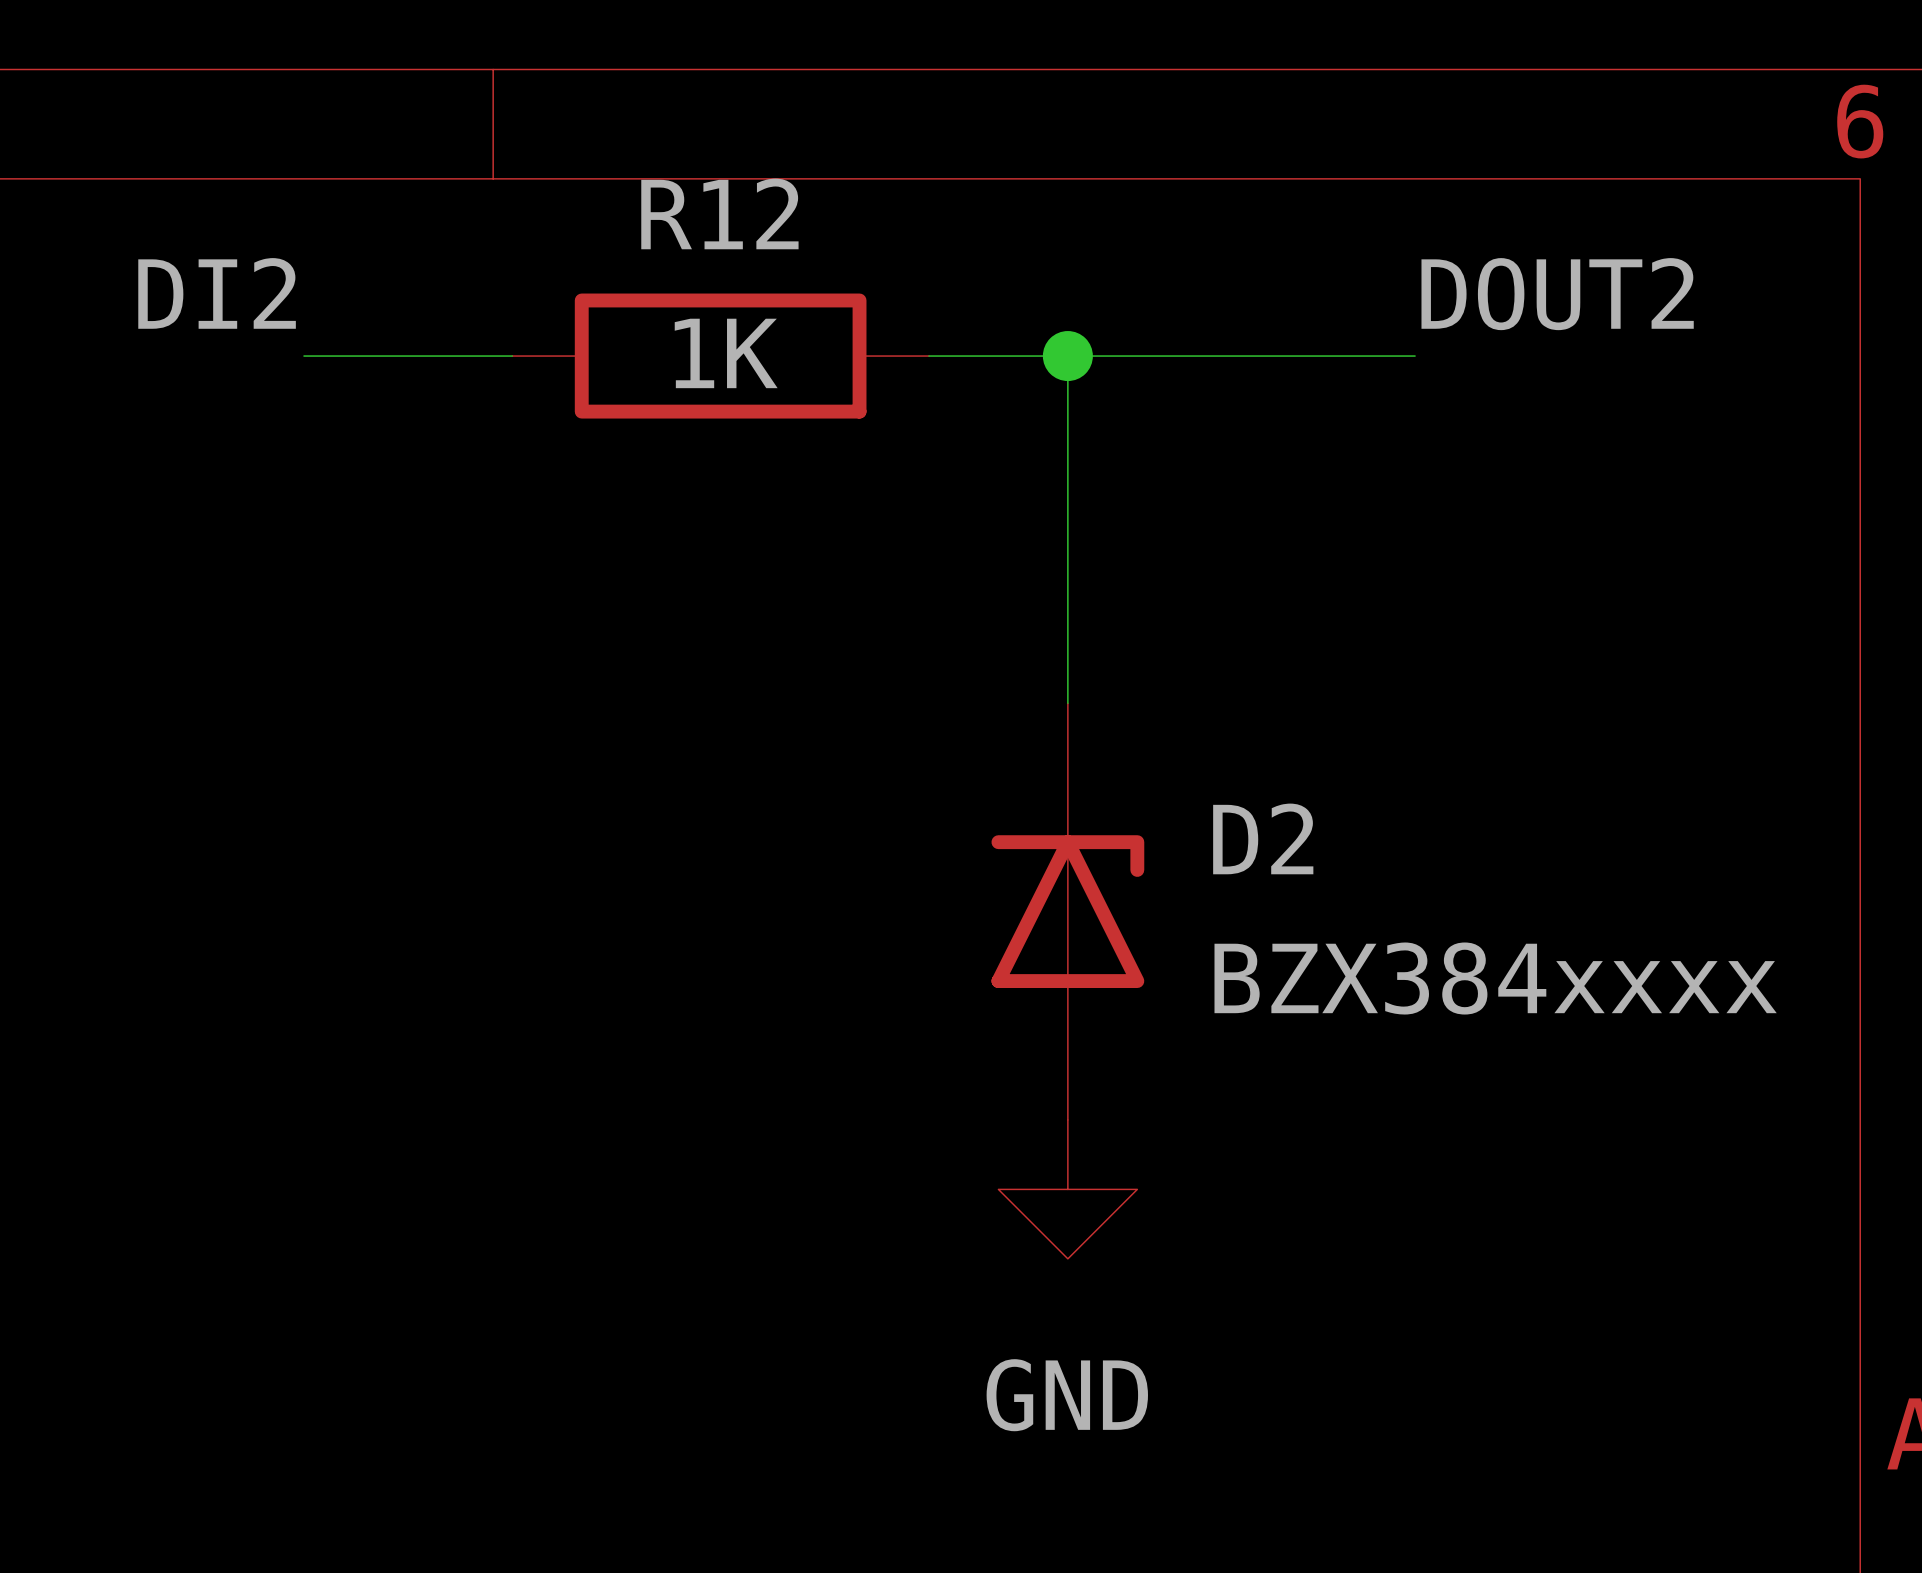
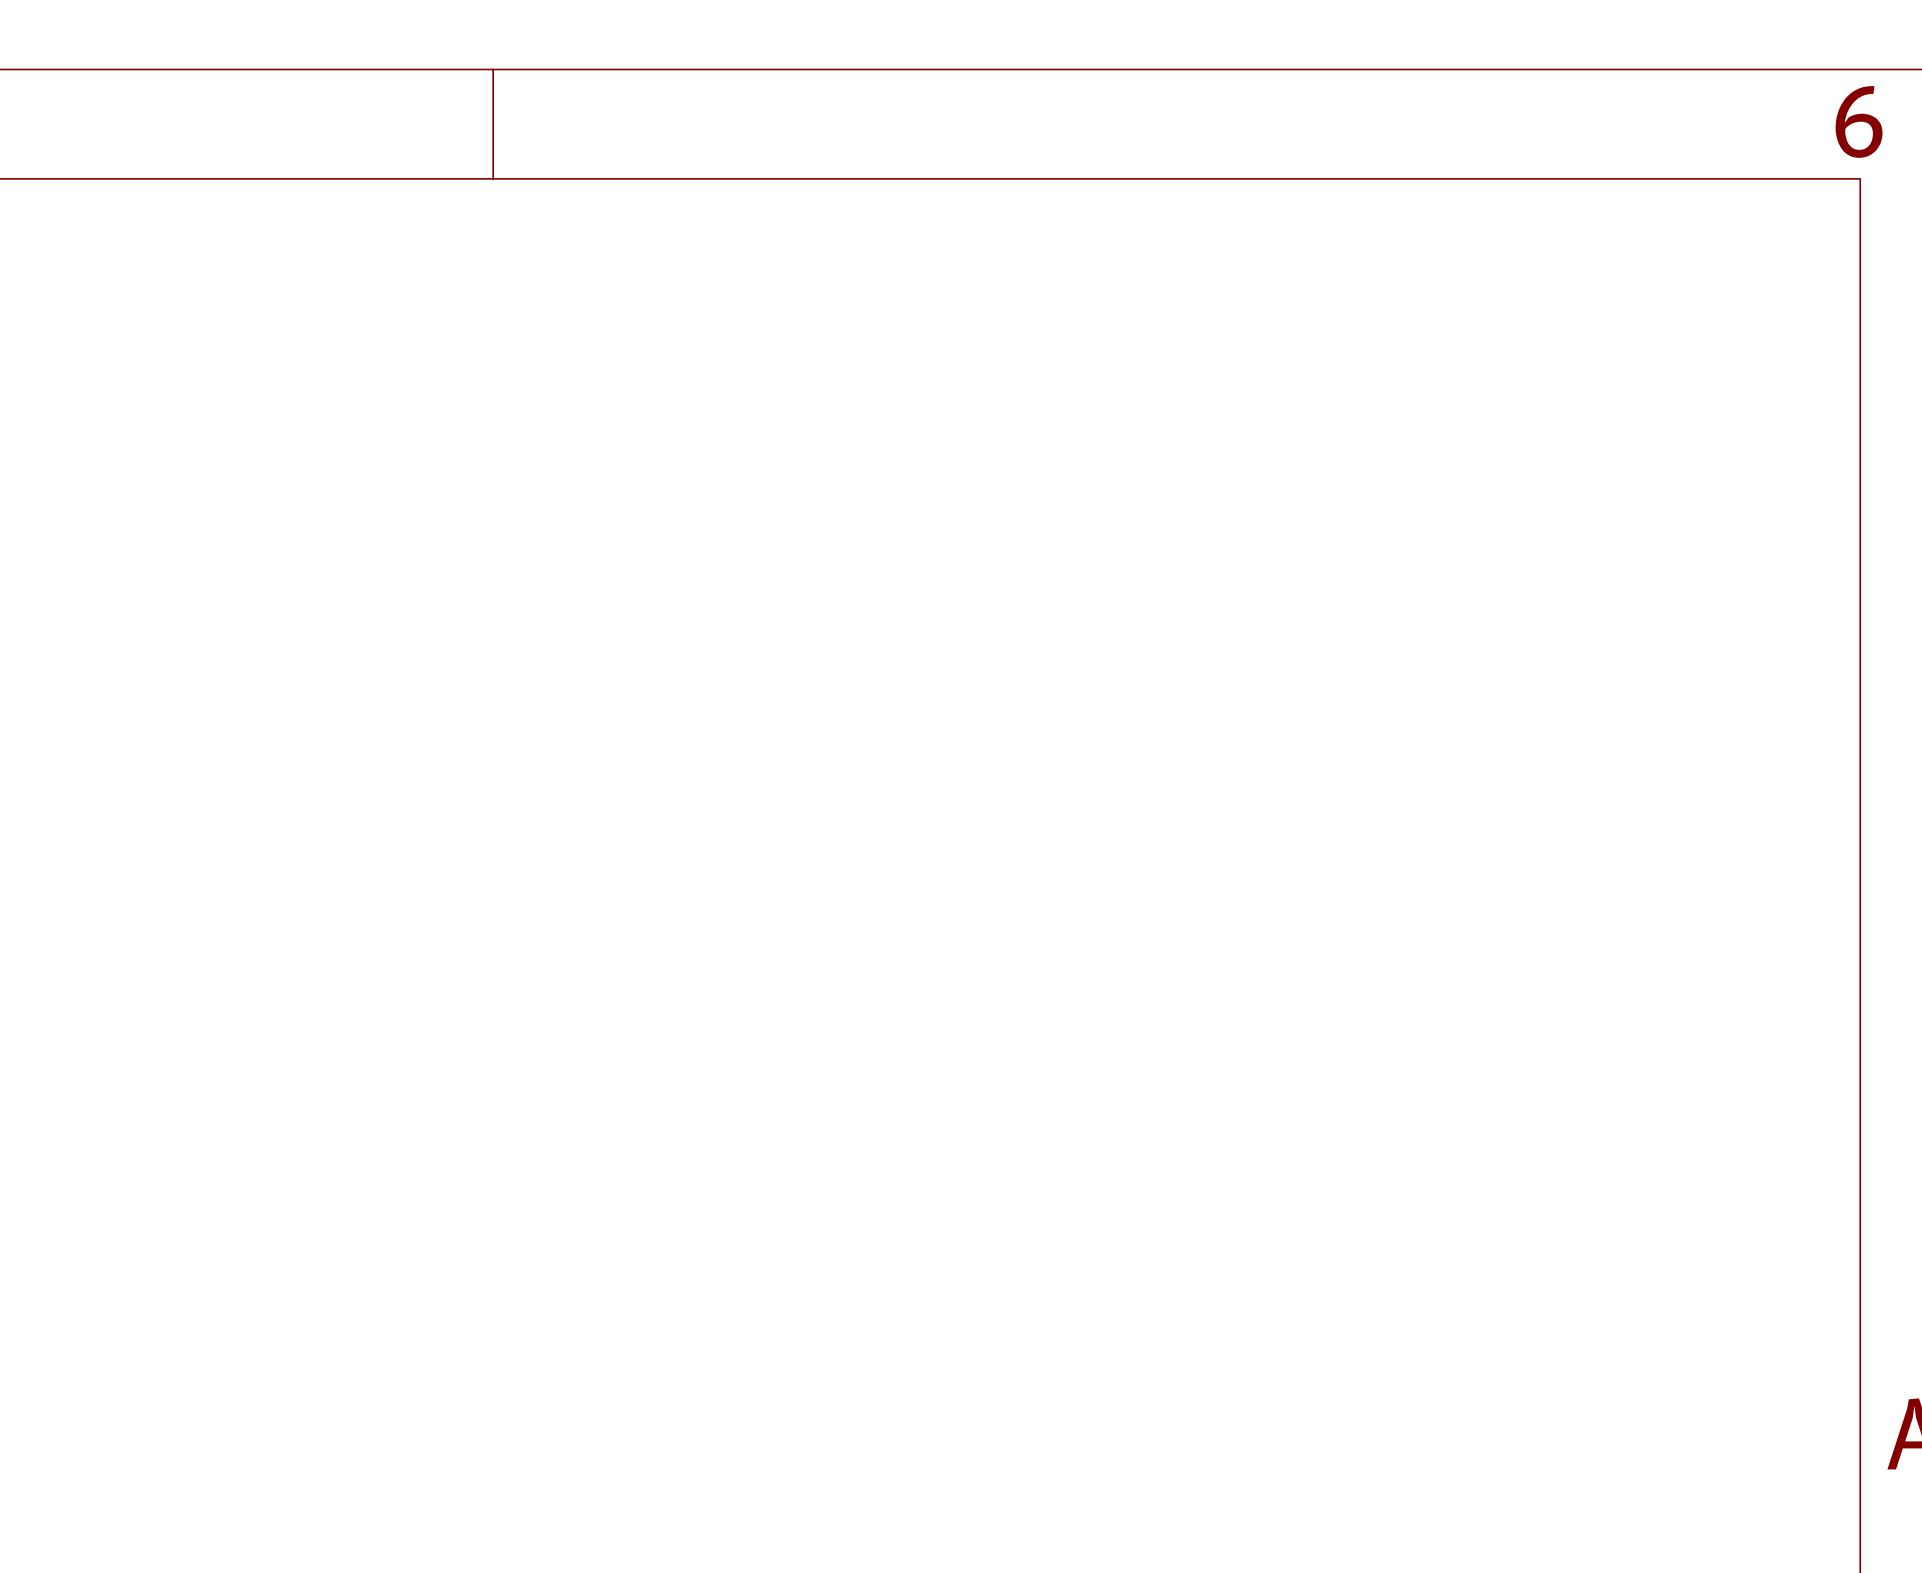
label: DI2 (217, 293) -> none
label: DOUT2 (1557, 294) -> none
wire: (303, 356) (512, 356) -> none
R12: 1K (720, 356) -> none
wire: (928, 356) (1415, 356) -> none
wire: (1067, 356) (1067, 703) -> none
junction: (1067, 356) -> none
D2: BZX384xxxx (1067, 911) -> none
power symbol: GND (1067, 1189) -> none

